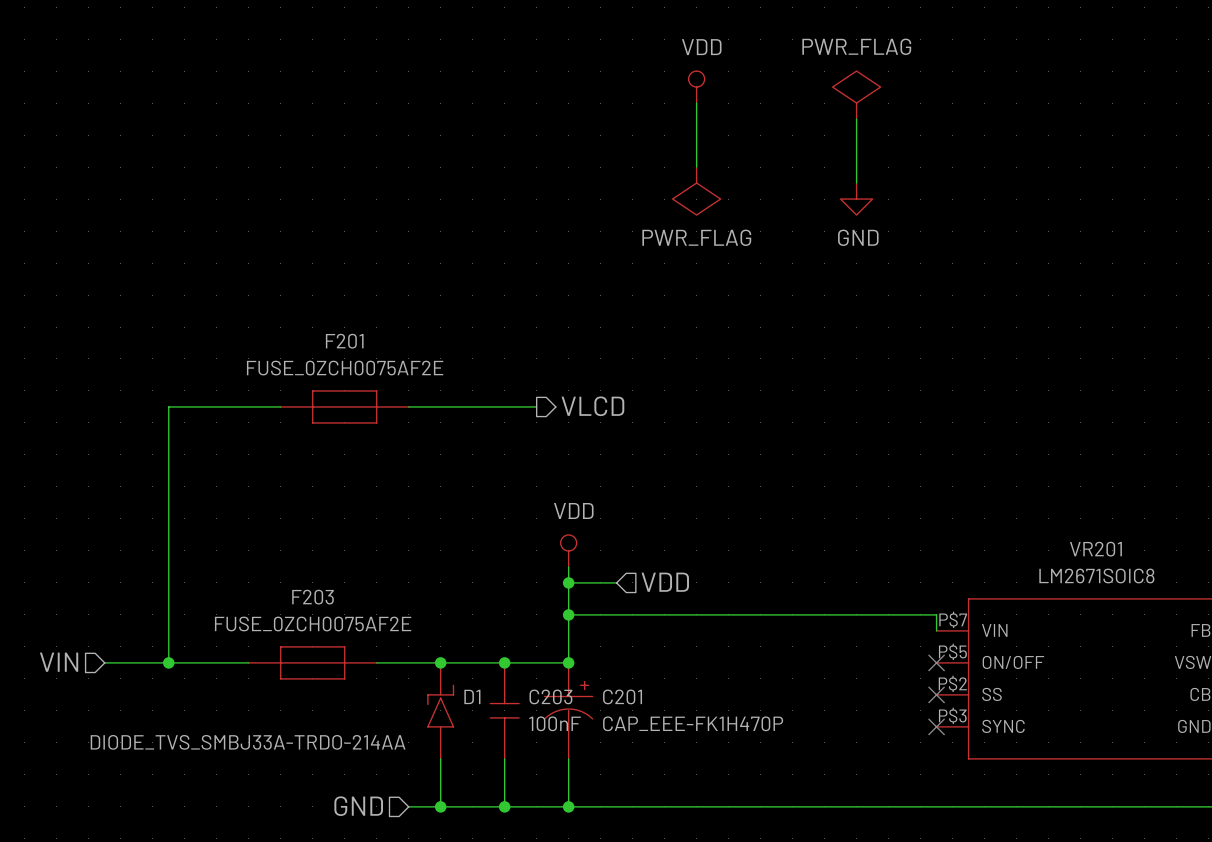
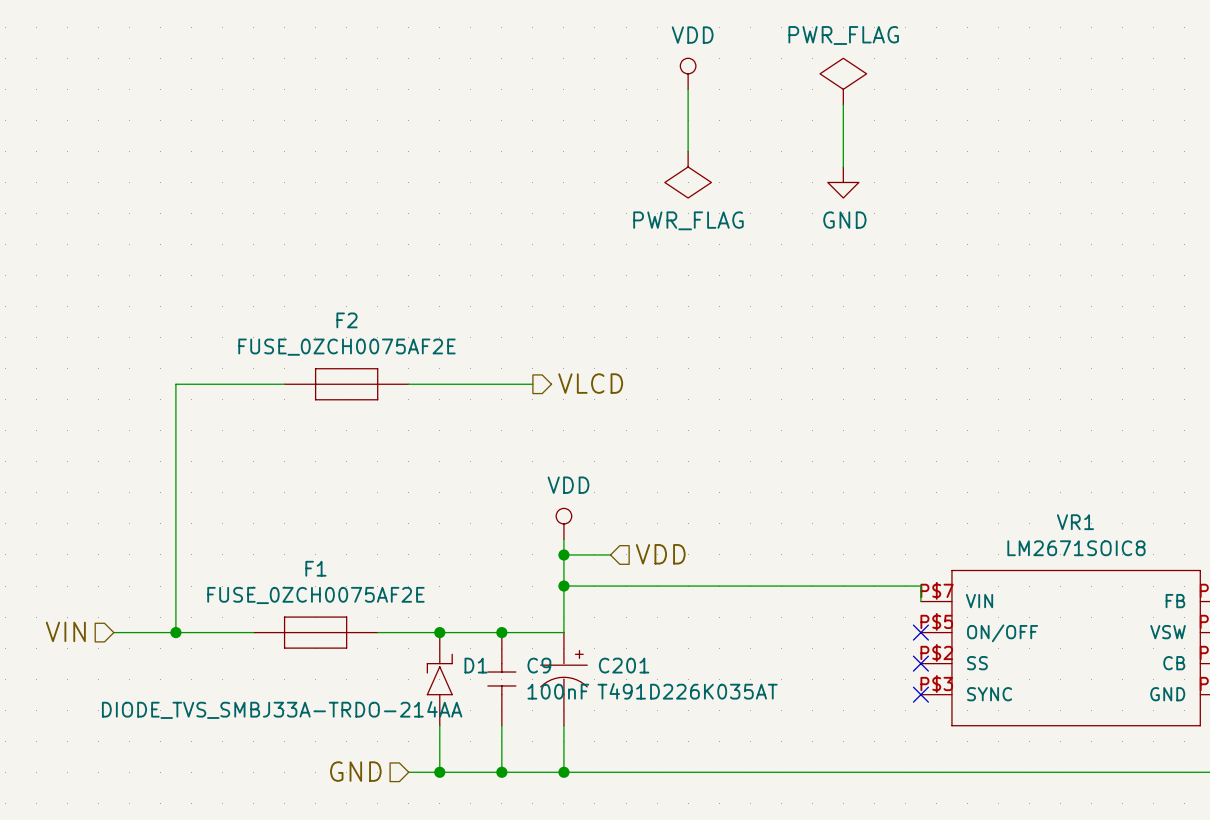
F201 name: F201 (344, 341) -> F2 (346, 320)
VR201 name: VR201 (1095, 549) -> VR1 (1075, 522)
F203 name: F203 (313, 597) -> F1 (315, 568)
junction: (568, 662) -> none
C203 name: C203 (550, 696) -> C9 (539, 665)
C201 value: CAP_EEE-FK1H470P (693, 723) -> T491D226K035AT (687, 691)

